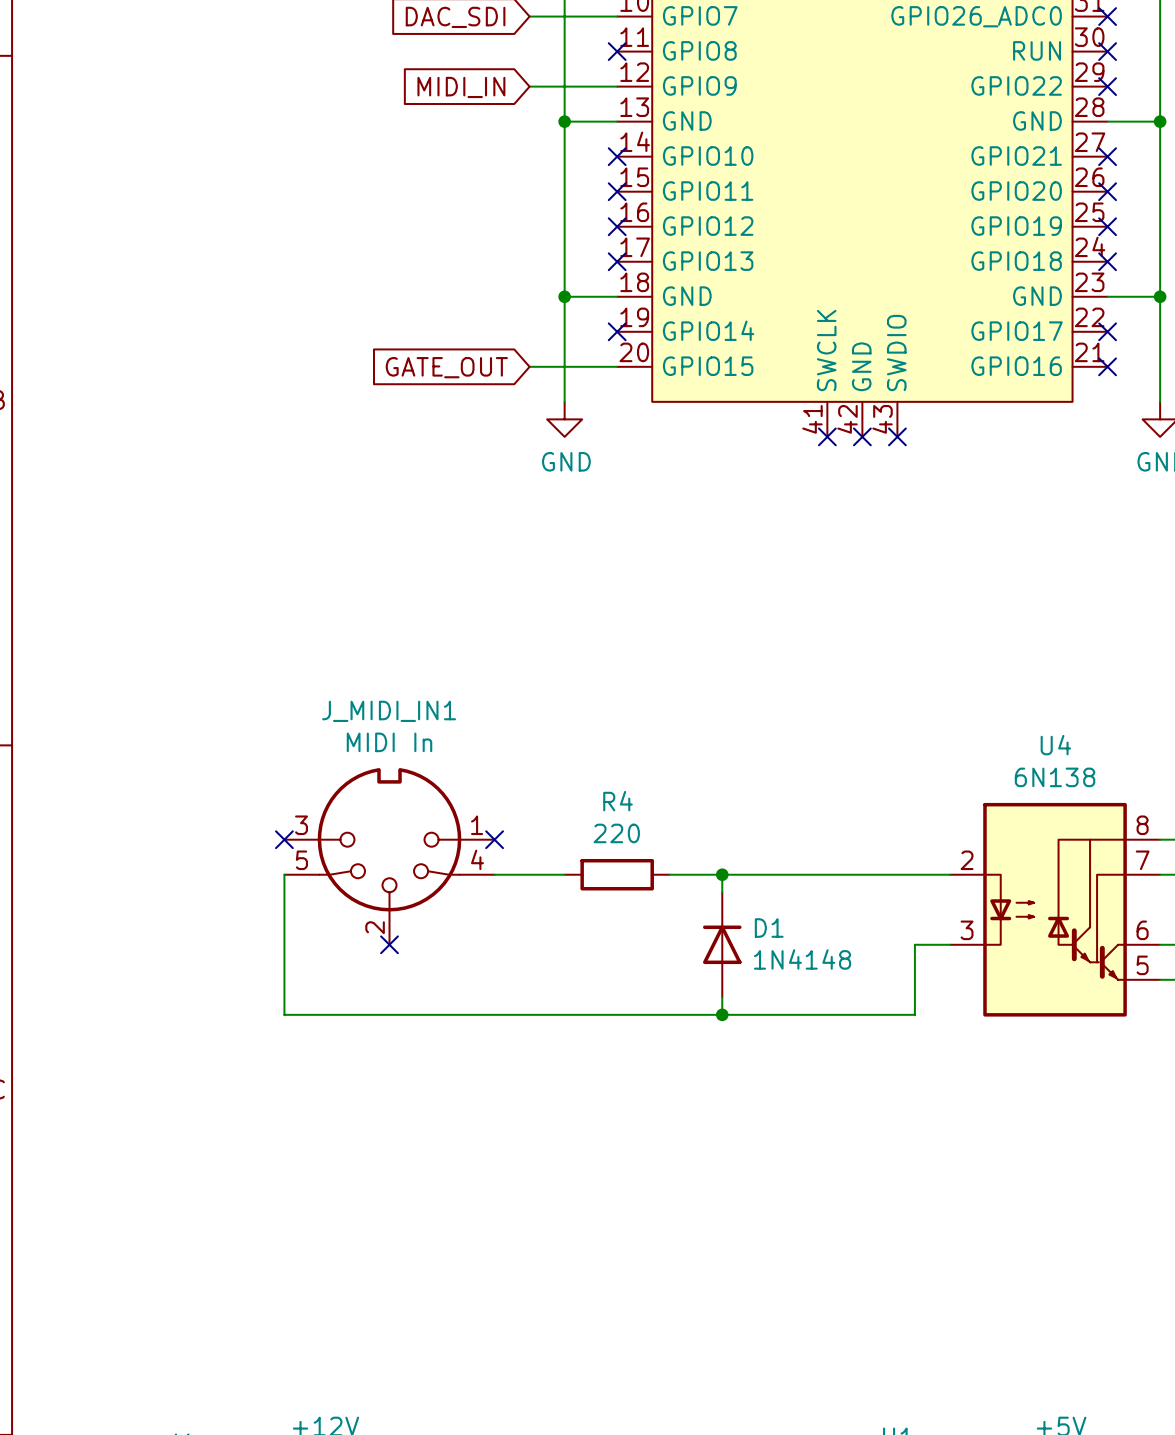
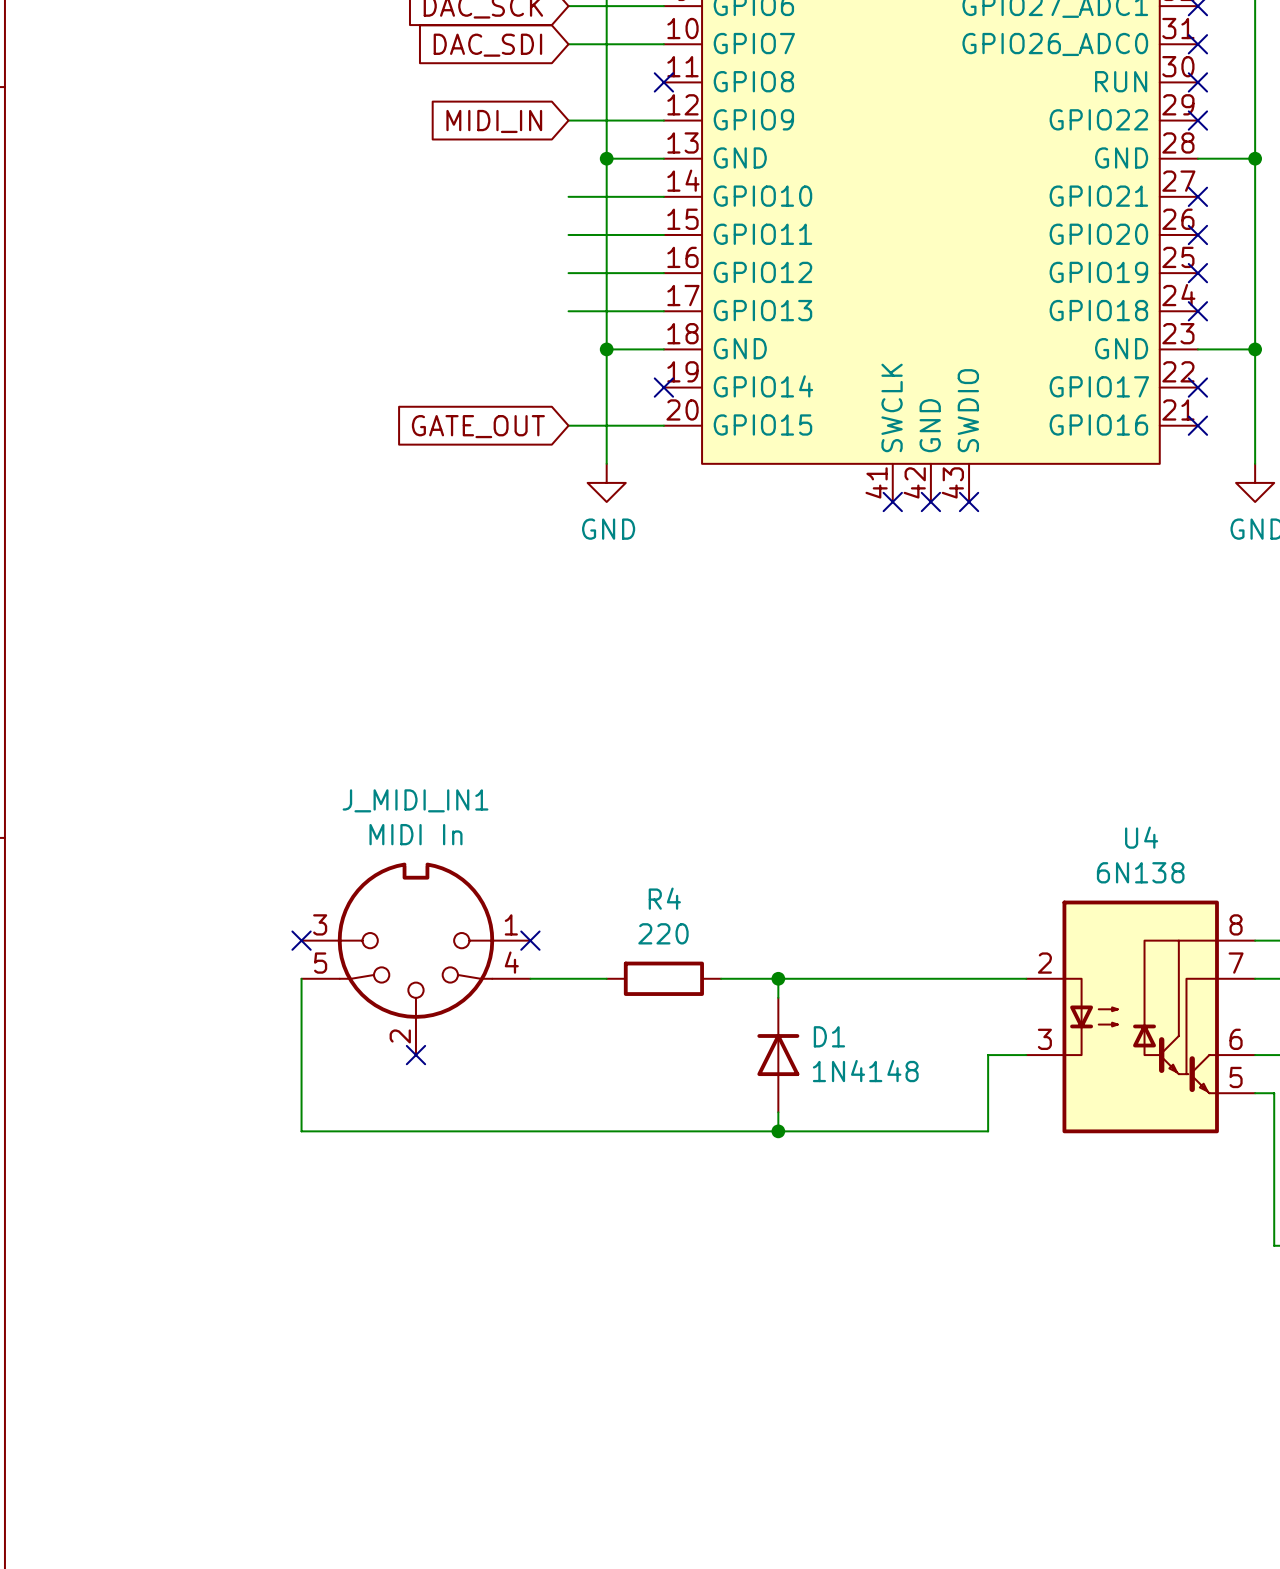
wire: none -> (568, 196) (663, 196)
no-connect mark: (617, 156) -> none
wire: none -> (568, 234) (663, 234)
no-connect mark: (617, 191) -> none
wire: none -> (568, 273) (663, 273)
no-connect mark: (617, 226) -> none
wire: none -> (568, 311) (663, 311)
no-connect mark: (617, 261) -> none

